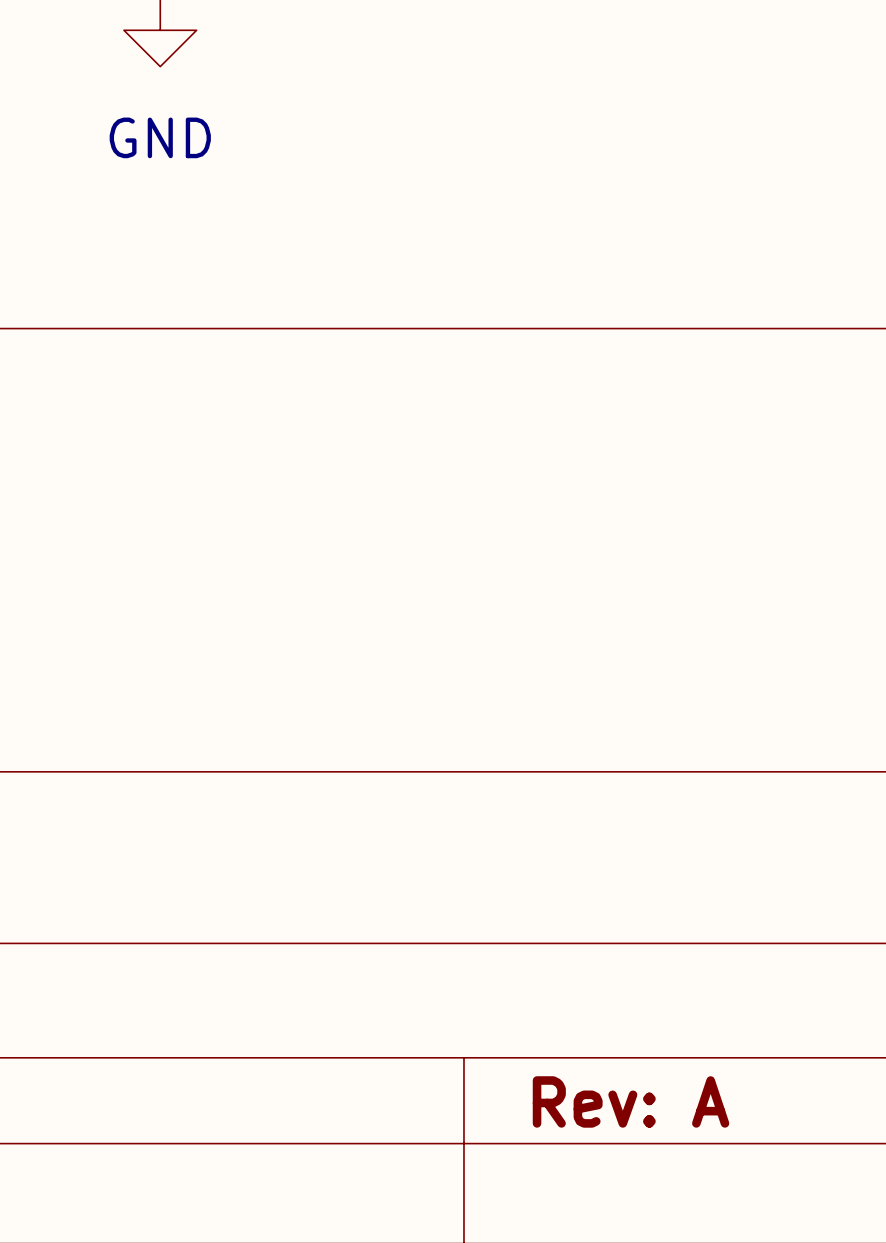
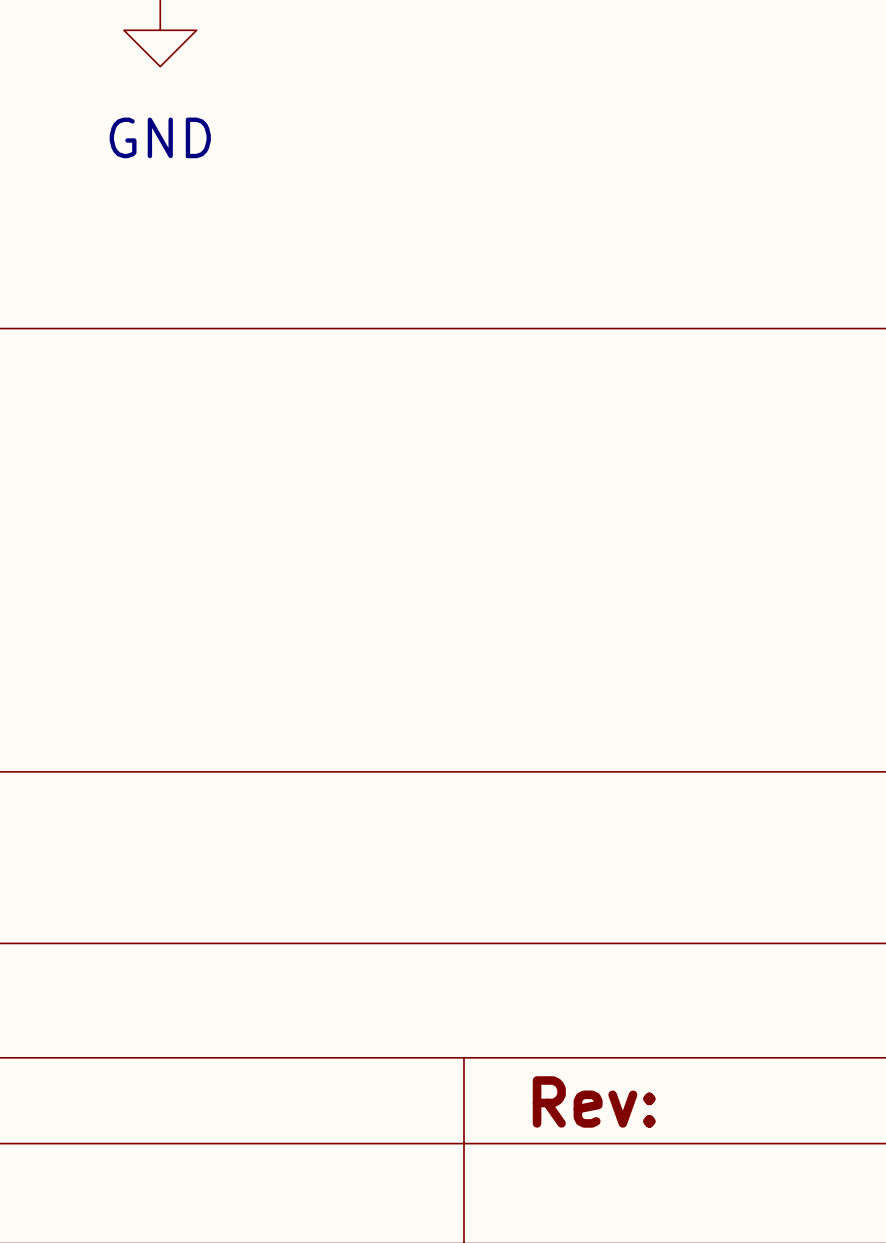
title block: Rev: A (631, 1101) -> Rev: (594, 1101)

